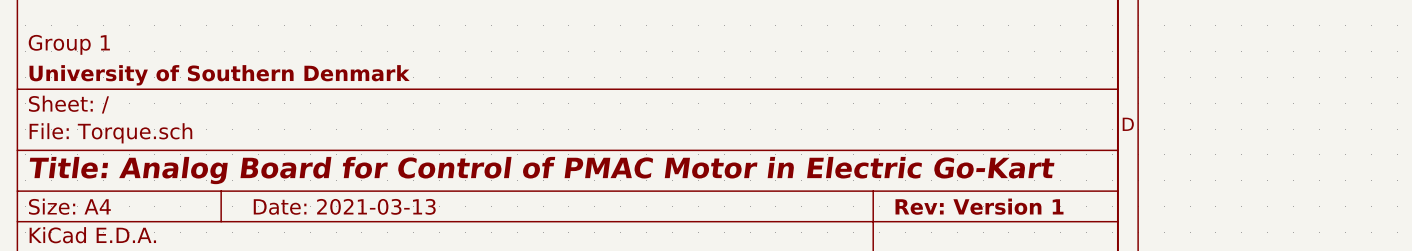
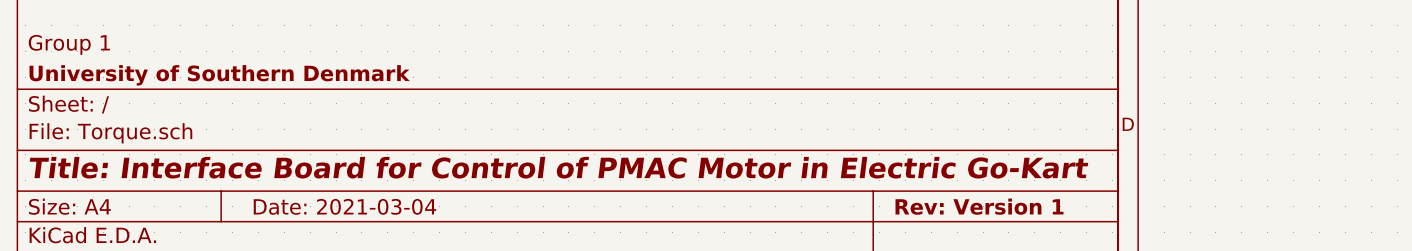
title block: Title: Analog Board for Control of PMAC Motor in Electric Go-Kart (542, 170) -> Title: Interface Board for Control of PMAC Motor in Electric Go-Kart (558, 167)
title block: Date: 2021-03-13 (344, 206) -> Date: 2021-03-04 (344, 206)

